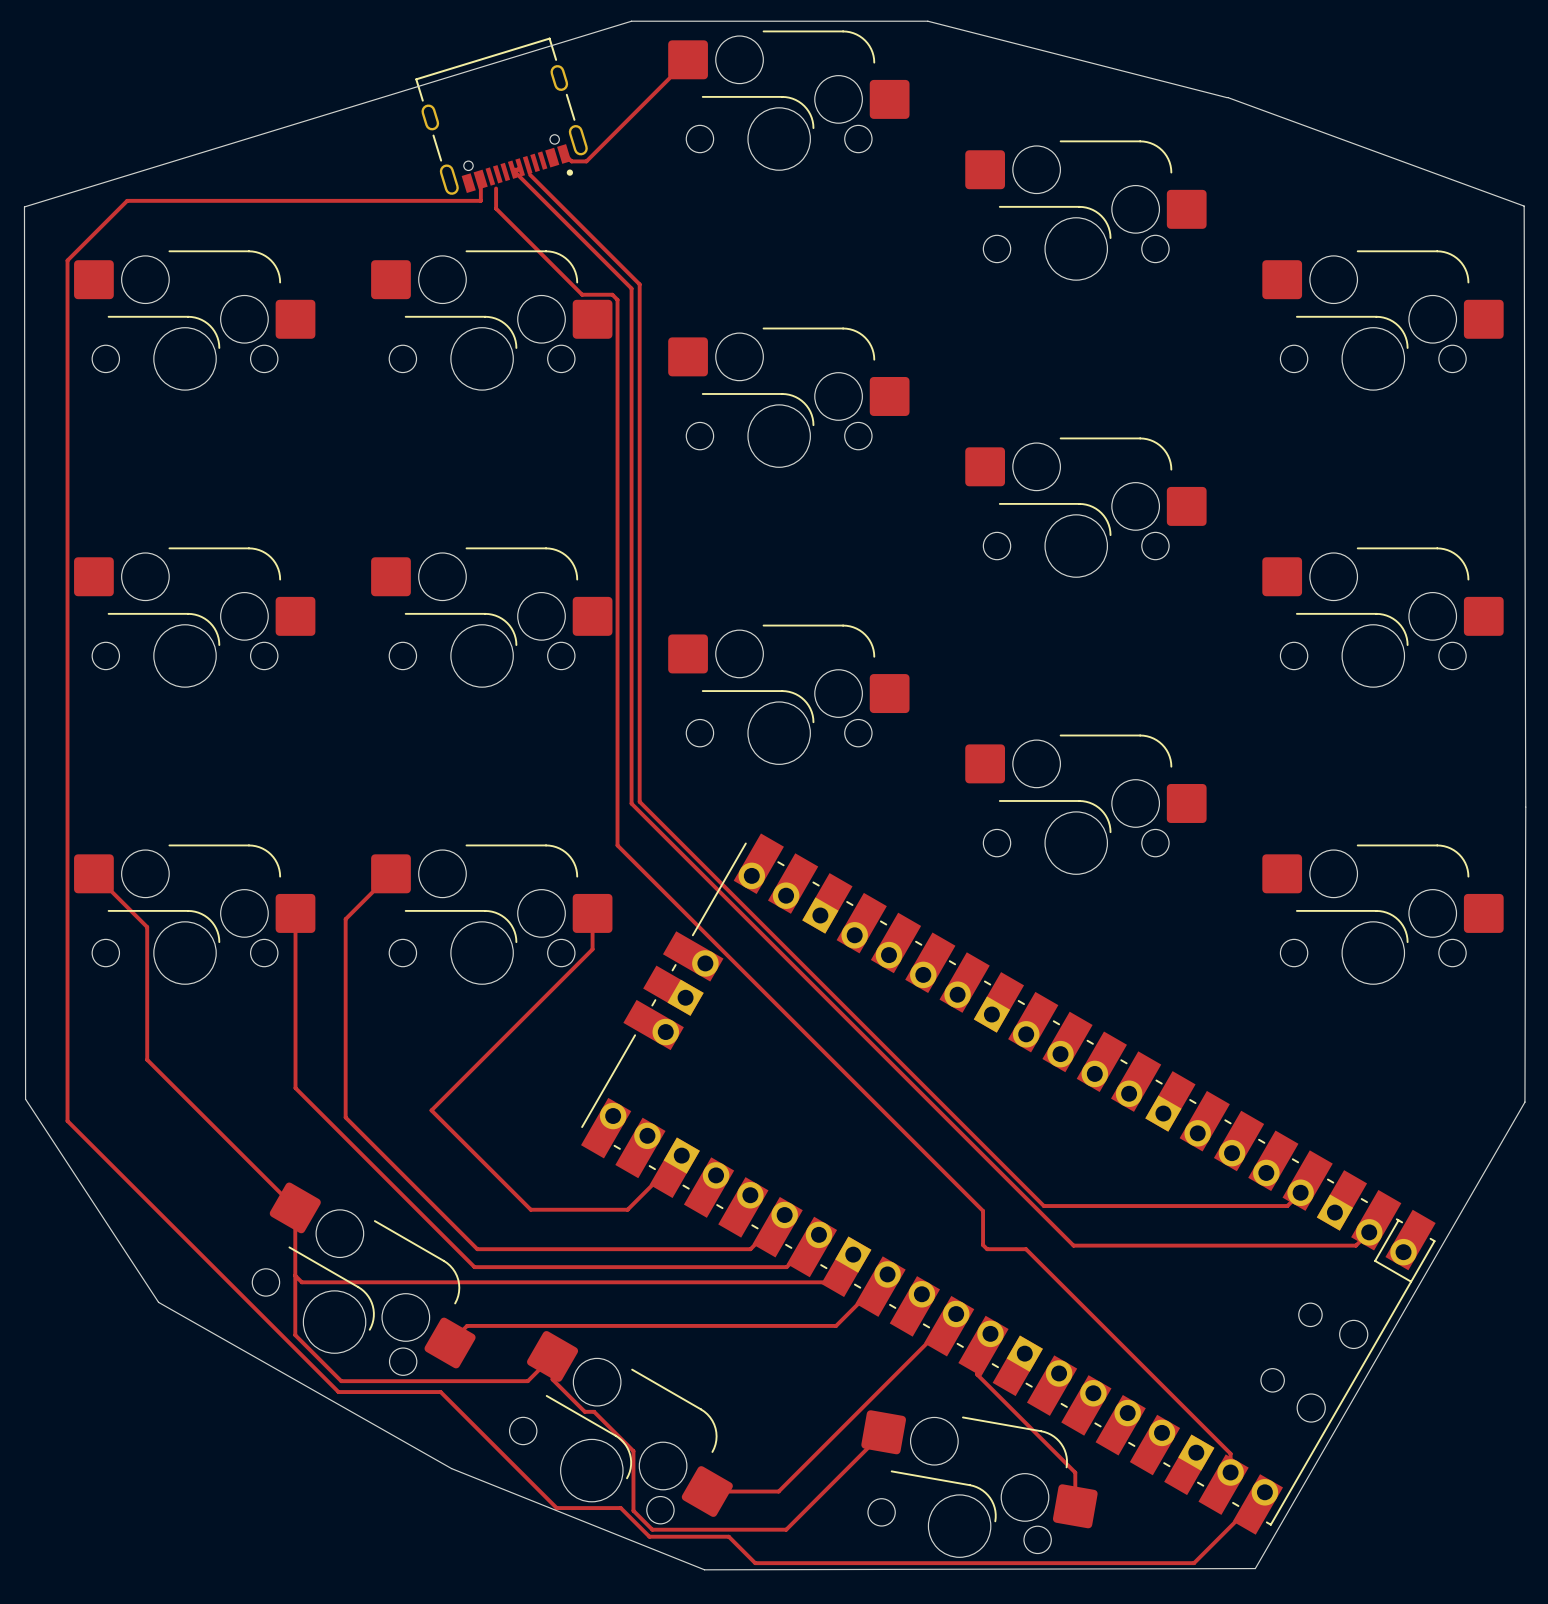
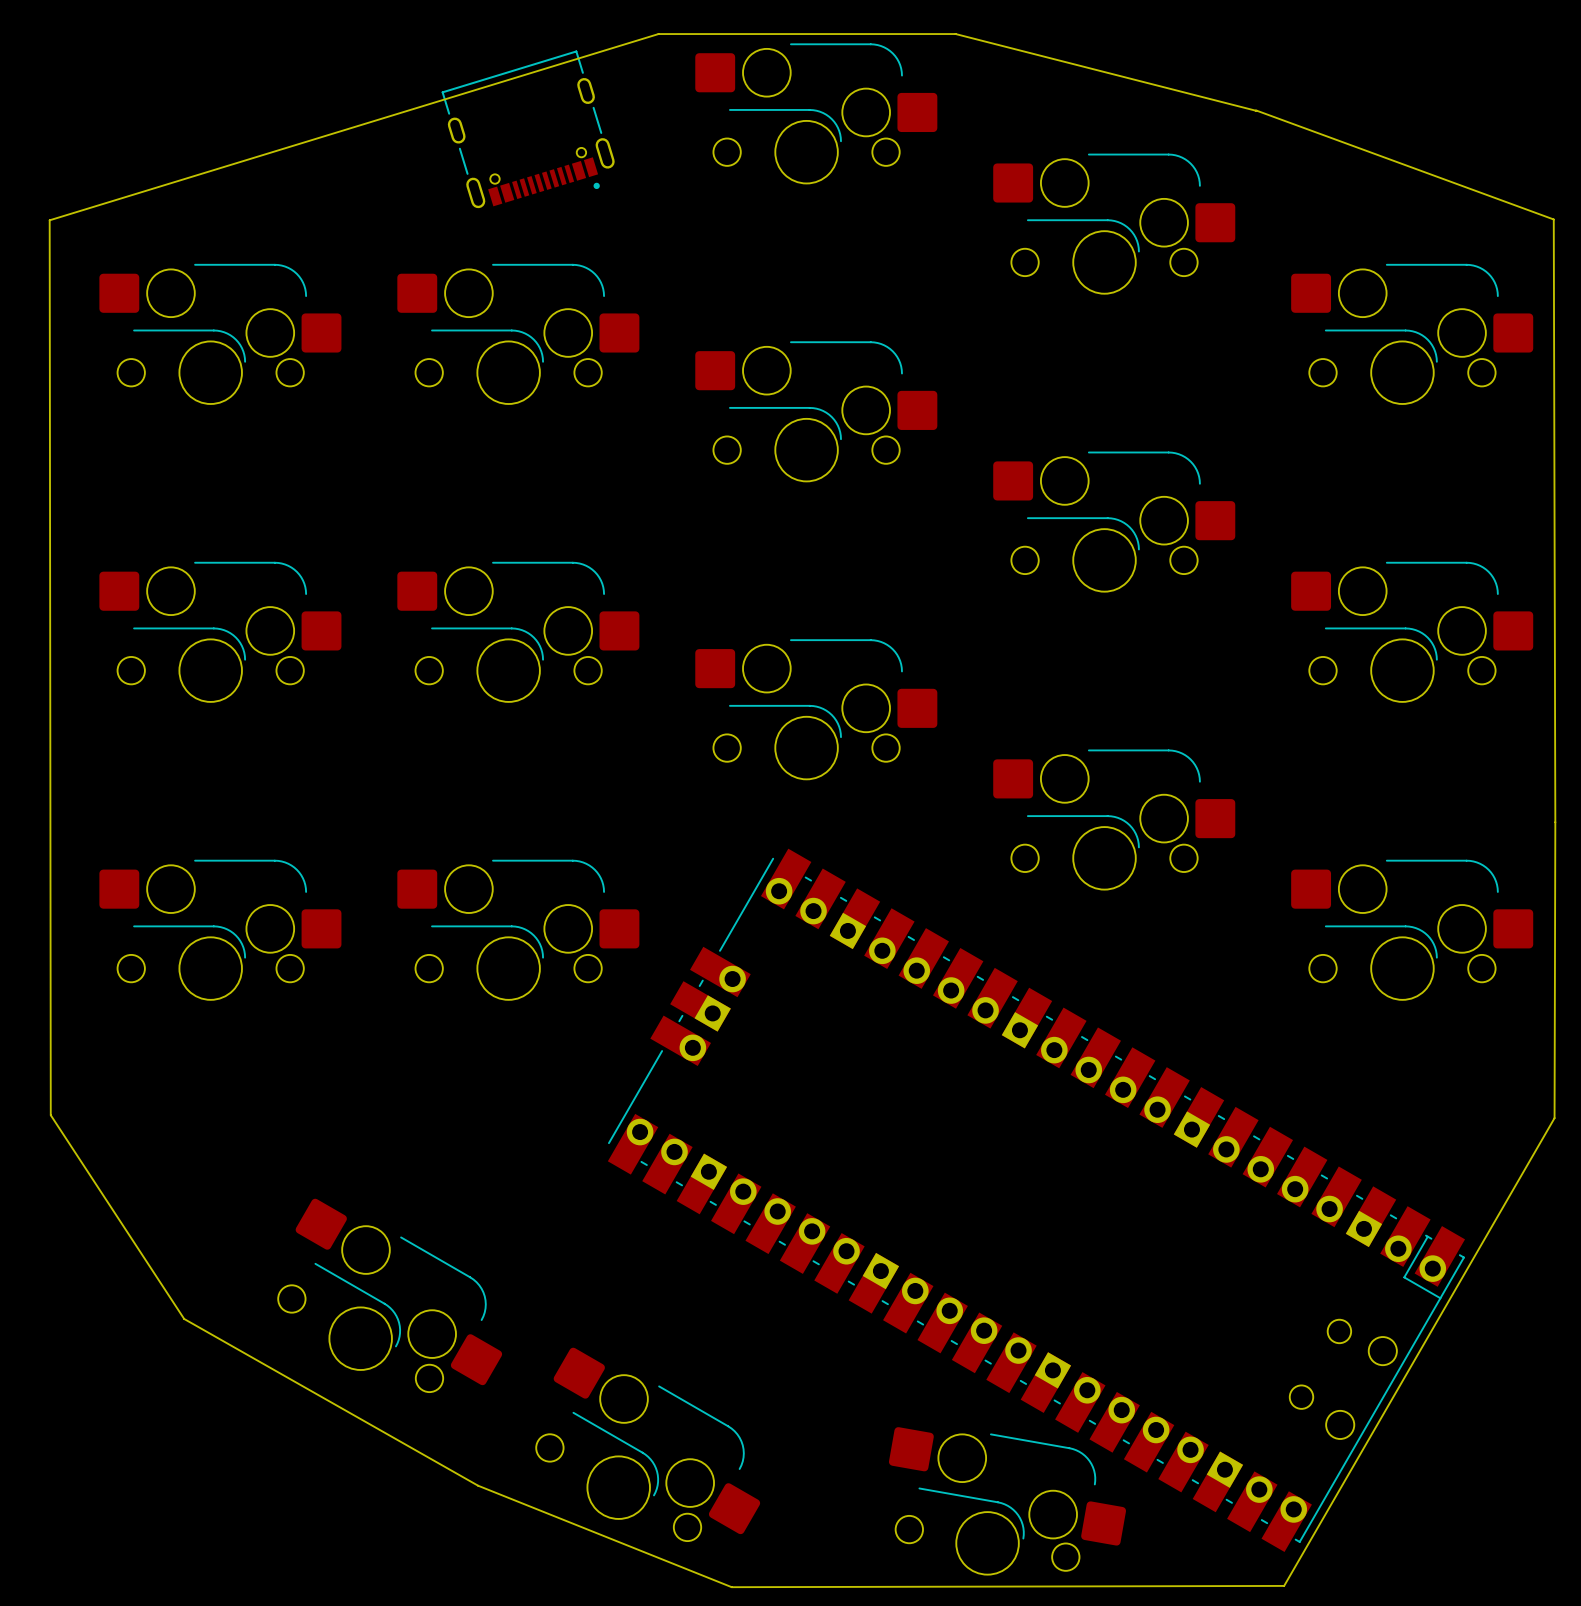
track: (688, 59) (586, 161) (571, 161) (564, 153) -> none
track: (520, 167) (517, 169) (512, 169) (631, 288) (631, 803) (1073, 1245) (1355, 1245) (1369, 1232) -> none
track: (530, 174) (639, 284) (639, 801) (1043, 1206) (1287, 1206) (1300, 1192) -> none
track: (480, 179) (480, 200) -> none
track: (496, 188) (496, 208) (582, 294) (612, 294) (617, 299) (617, 845) (983, 1210) (983, 1245) (987, 1249) (1026, 1249) (1230, 1453) (1230, 1472) -> none
track: (480, 200) (127, 200) (67, 260) (67, 1121) (338, 1392) (440, 1392) (556, 1508) (620, 1508) (649, 1536) (728, 1536) (755, 1563) (1194, 1563) (1264, 1492) -> none
track: (93, 873) (147, 927) (147, 1059) (295, 1207) (295, 1335) (341, 1381) (527, 1381) (552, 1356) (552, 1379) (584, 1411) (594, 1411) (633, 1451) (633, 1510) (652, 1529) (786, 1529) (883, 1432) -> none
track: (390, 873) (345, 919) (345, 1117) (477, 1249) (750, 1249) (784, 1215) -> none
track: (295, 913) (295, 1088) (474, 1267) (786, 1267) (818, 1234) -> none
track: (592, 913) (592, 949) (431, 1110) (530, 1209) (627, 1209) (681, 1155) -> none
track: (853, 1254) (825, 1282) (301, 1282) (295, 1275) -> none
track: (887, 1274) (836, 1325) (467, 1325) (450, 1343) -> none
track: (956, 1314) (778, 1491) (707, 1491) -> none
track: (990, 1333) (977, 1347) (977, 1374) (1075, 1472) (1075, 1506) -> none

